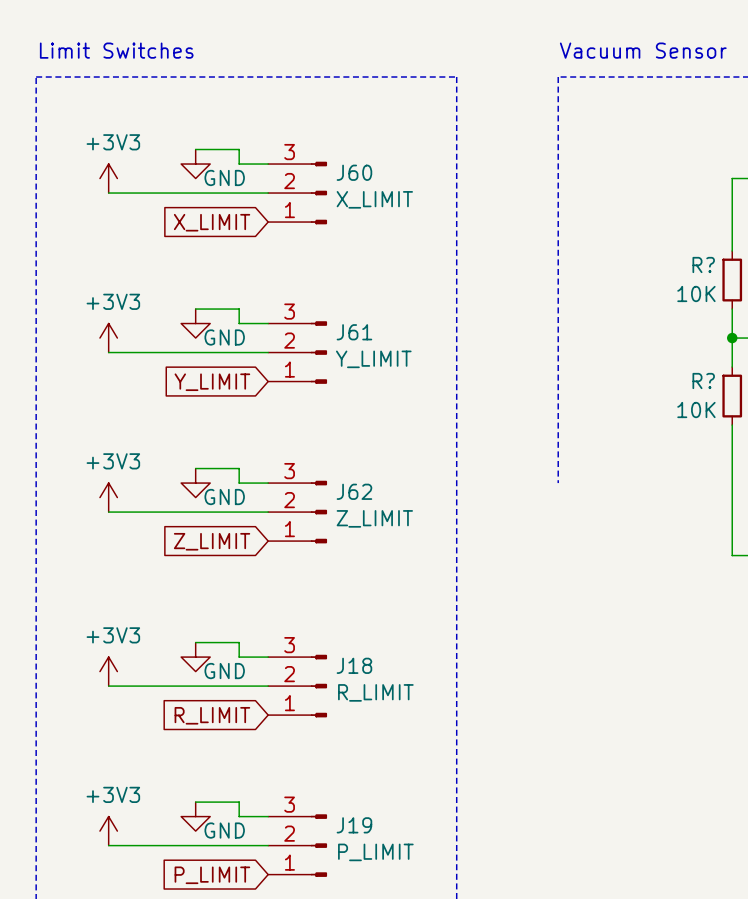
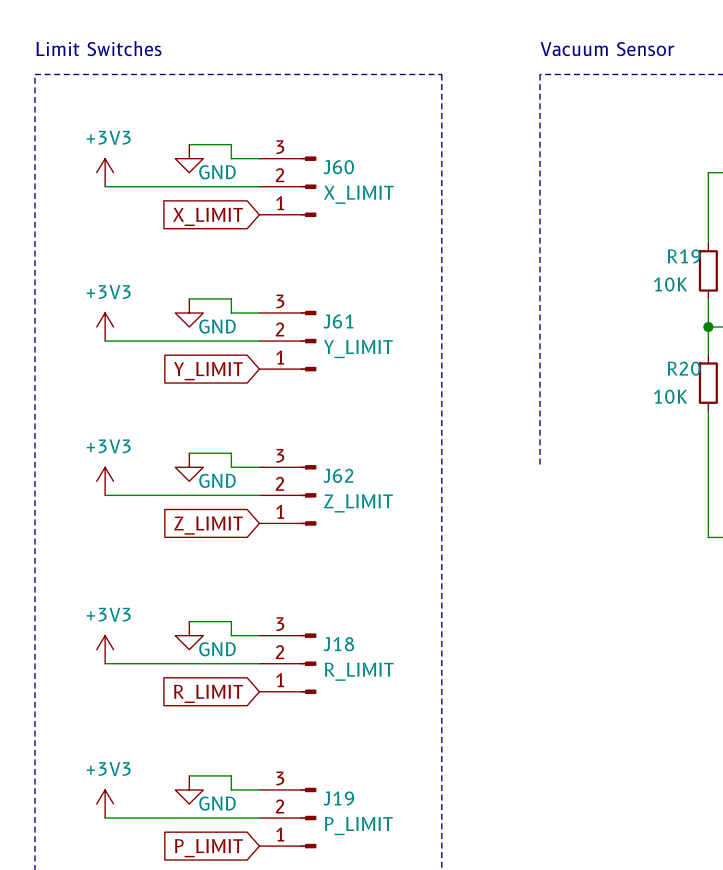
R? name: R? (703, 264) -> R19 (684, 256)
R? name: R? (703, 381) -> R20 (684, 368)

